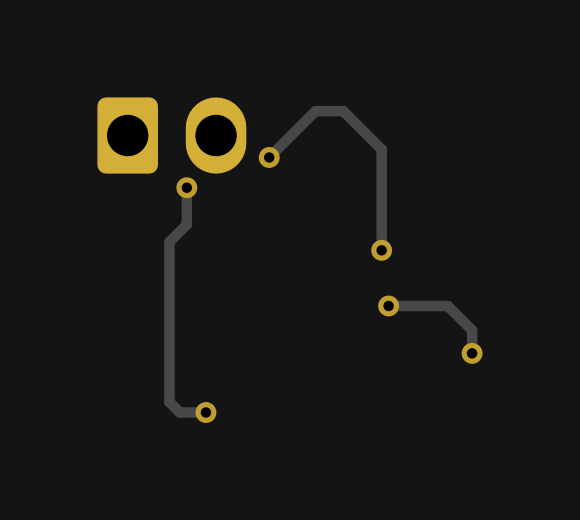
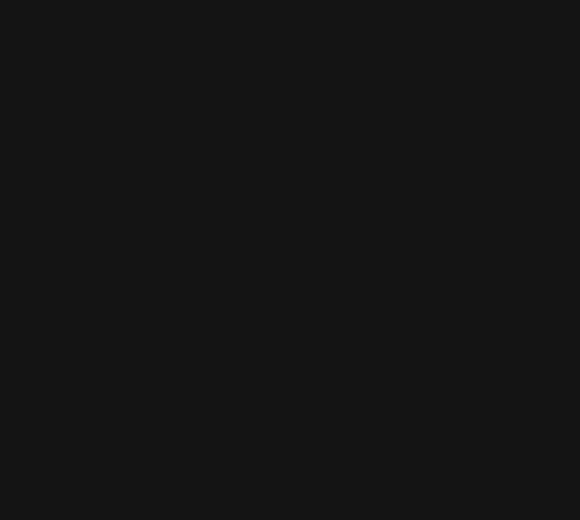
part: (171, 135) -> none
track: (269, 157) (315, 111) (343, 111) (381, 149) (381, 250) -> none
via: (269, 157) -> none
track: (186, 187) (186, 224) (169, 242) (169, 402) (179, 412) (205, 412) -> none
via: (186, 187) -> none
via: (381, 250) -> none
track: (388, 305) (447, 305) (472, 330) (472, 353) -> none
via: (388, 305) -> none
via: (472, 353) -> none
via: (205, 412) -> none

